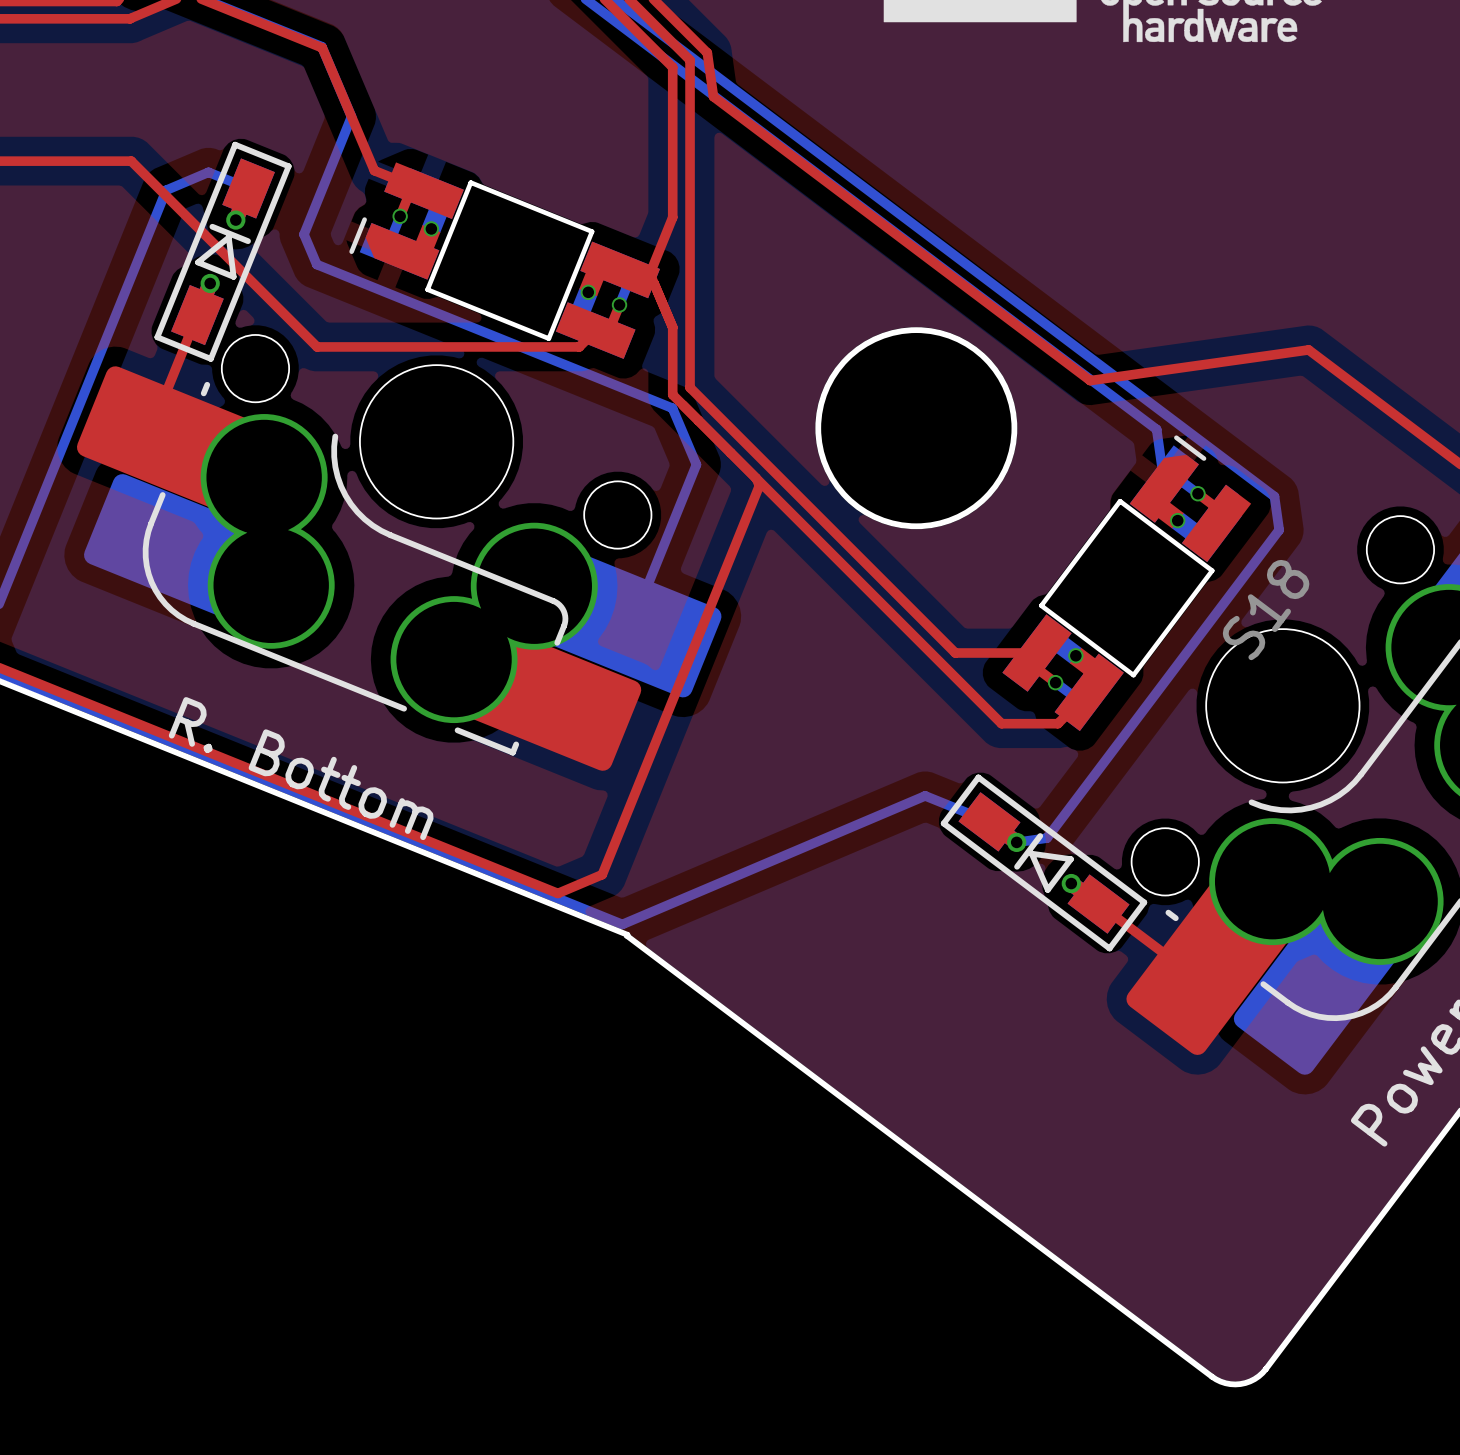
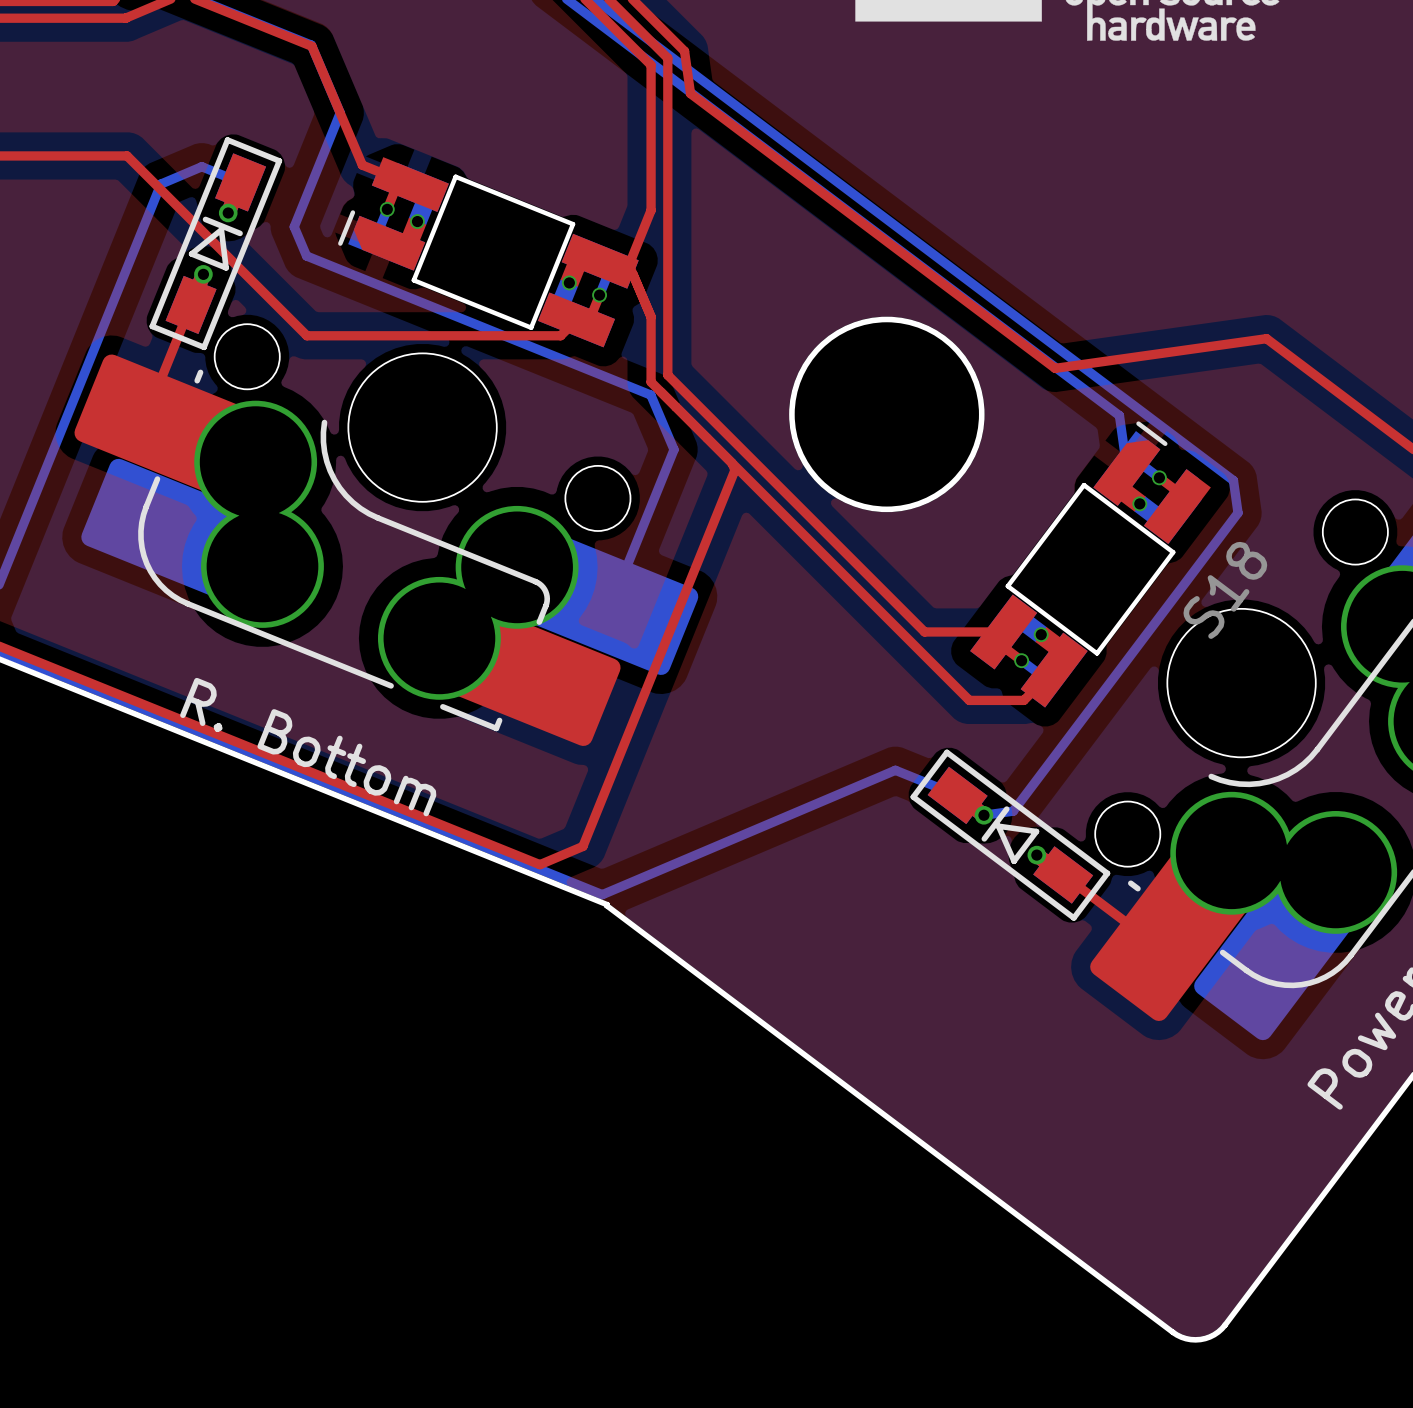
text position: R. Bottom (301, 768) -> R. Bottom (308, 747)

